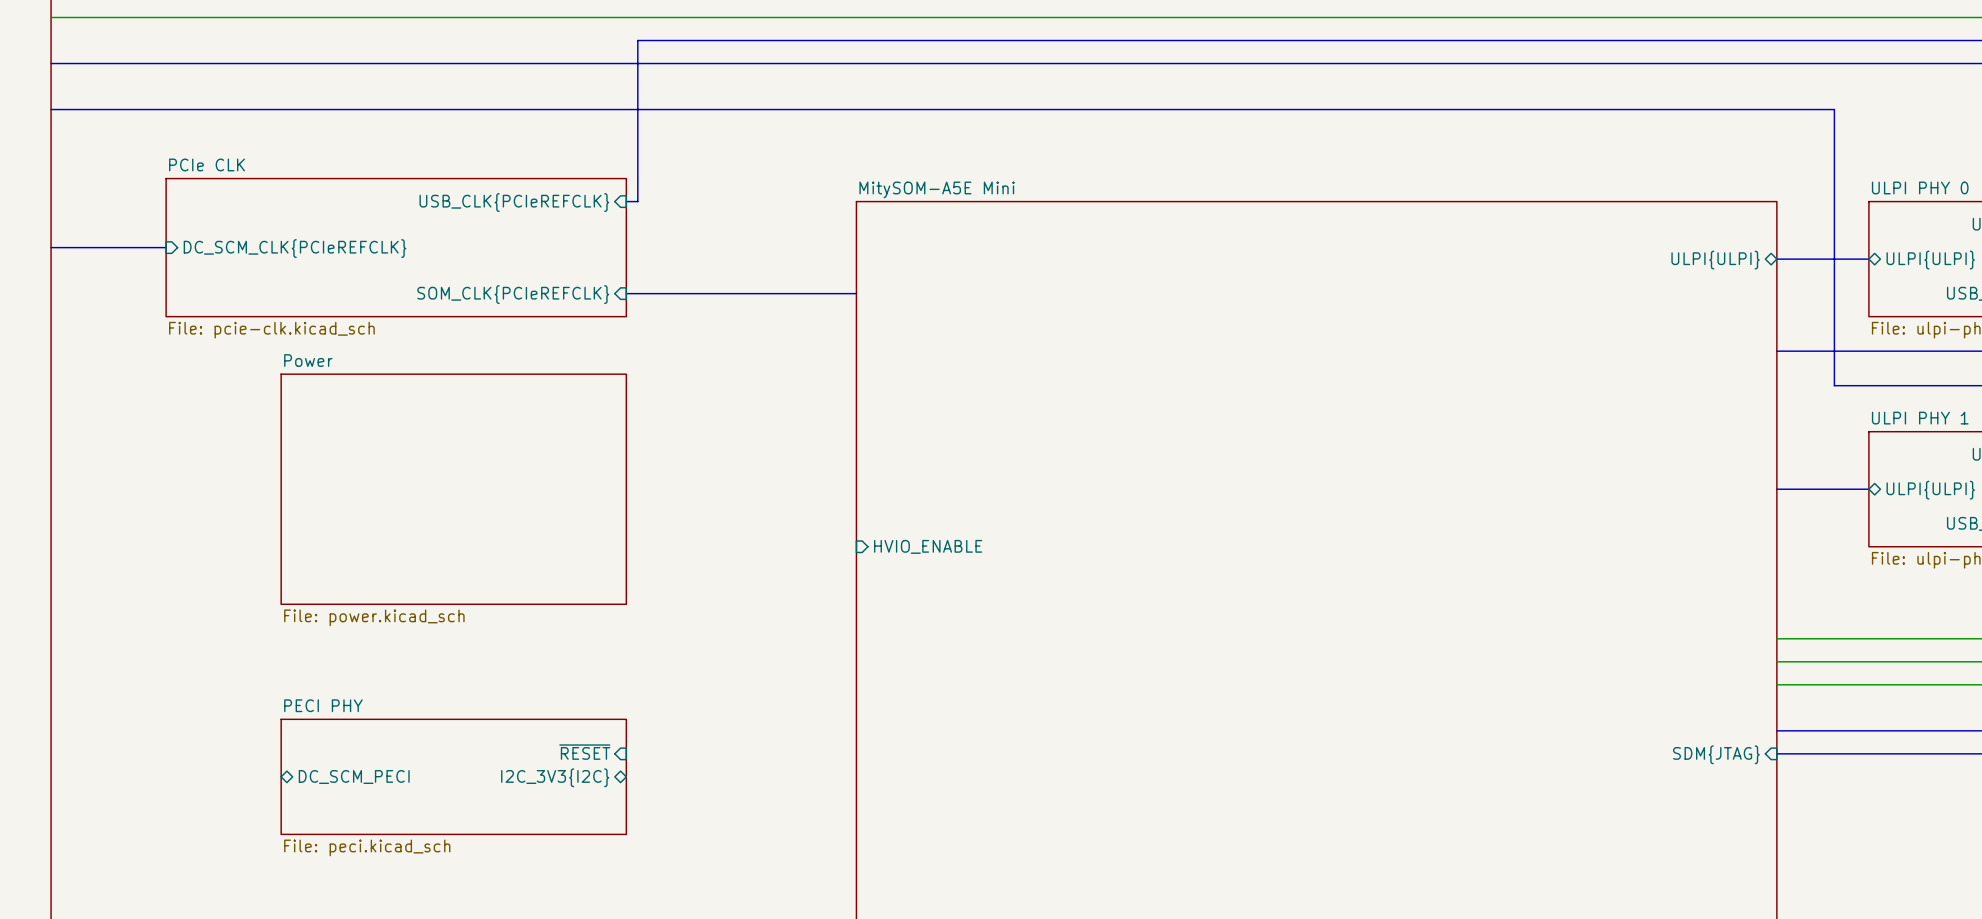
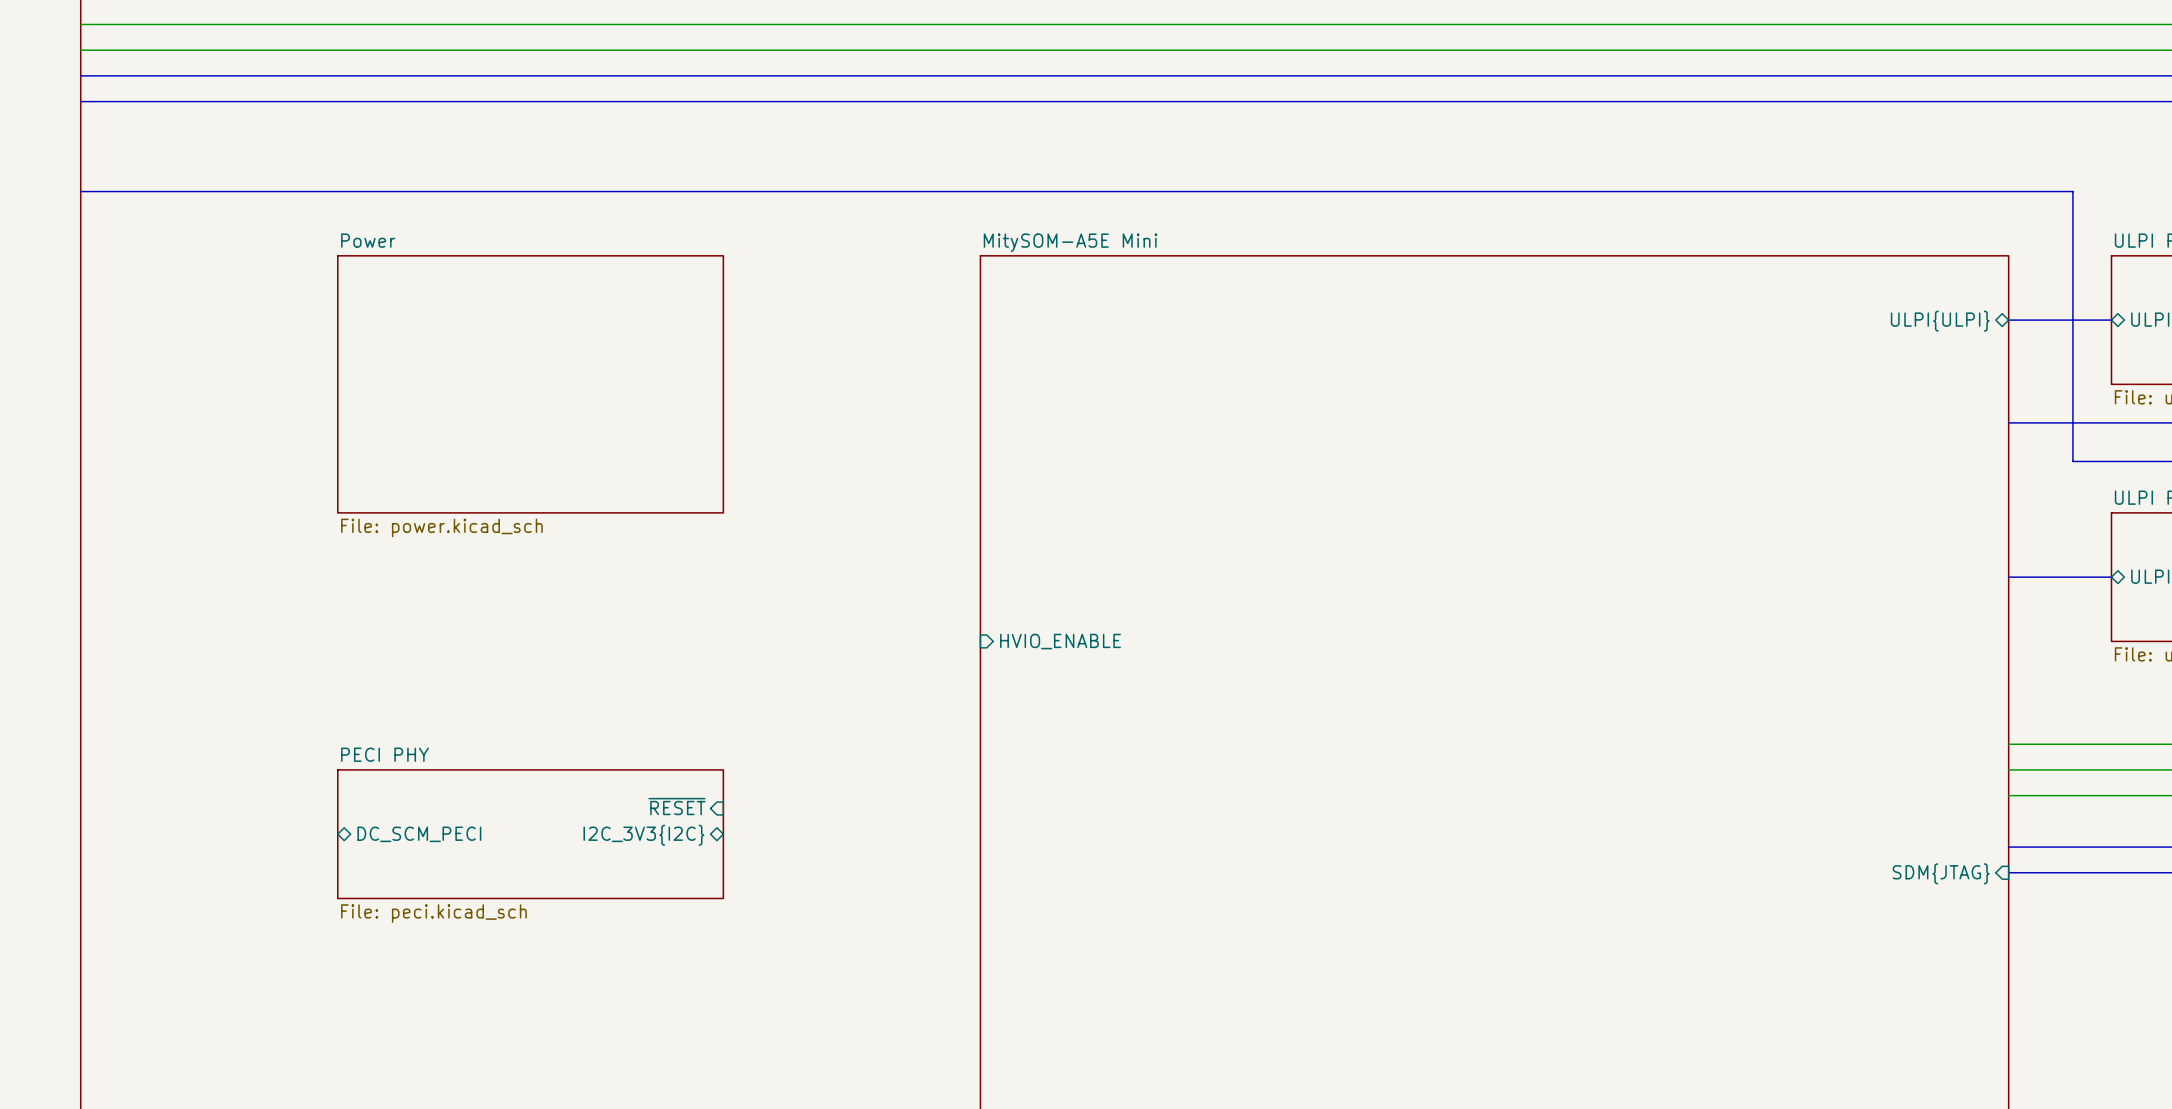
bus: (637, 40) (637, 201) (626, 201) -> (736, 75) (80, 75)
bus: (51, 109) (1834, 109) (1834, 144) -> (80, 191) (2072, 191)
sheet pin: USB_CLK{PCIeREFCLK} (514, 202) -> none
bus: (51, 247) (166, 247) -> none
sheet PCIe CLK: File: pcie-clk.kicad_sch (396, 247) -> none
sheet pin: DC_SCM_CLK{PCIeREFCLK} (295, 248) -> none
bus: (626, 293) (856, 293) -> none
sheet pin: SOM_CLK{PCIeREFCLK} (513, 294) -> none
sheet Power position: (453, 489) -> (530, 384)
sheet pin position: ~{RESET} (584, 752) -> ~{RESET} (676, 806)
sheet pin position: DC_SCM_PECI (354, 776) -> DC_SCM_PECI (419, 834)
sheet PECI PHY position: (453, 776) -> (530, 834)
sheet pin position: I2C_3V3{I2C} (555, 777) -> I2C_3V3{I2C} (643, 835)

